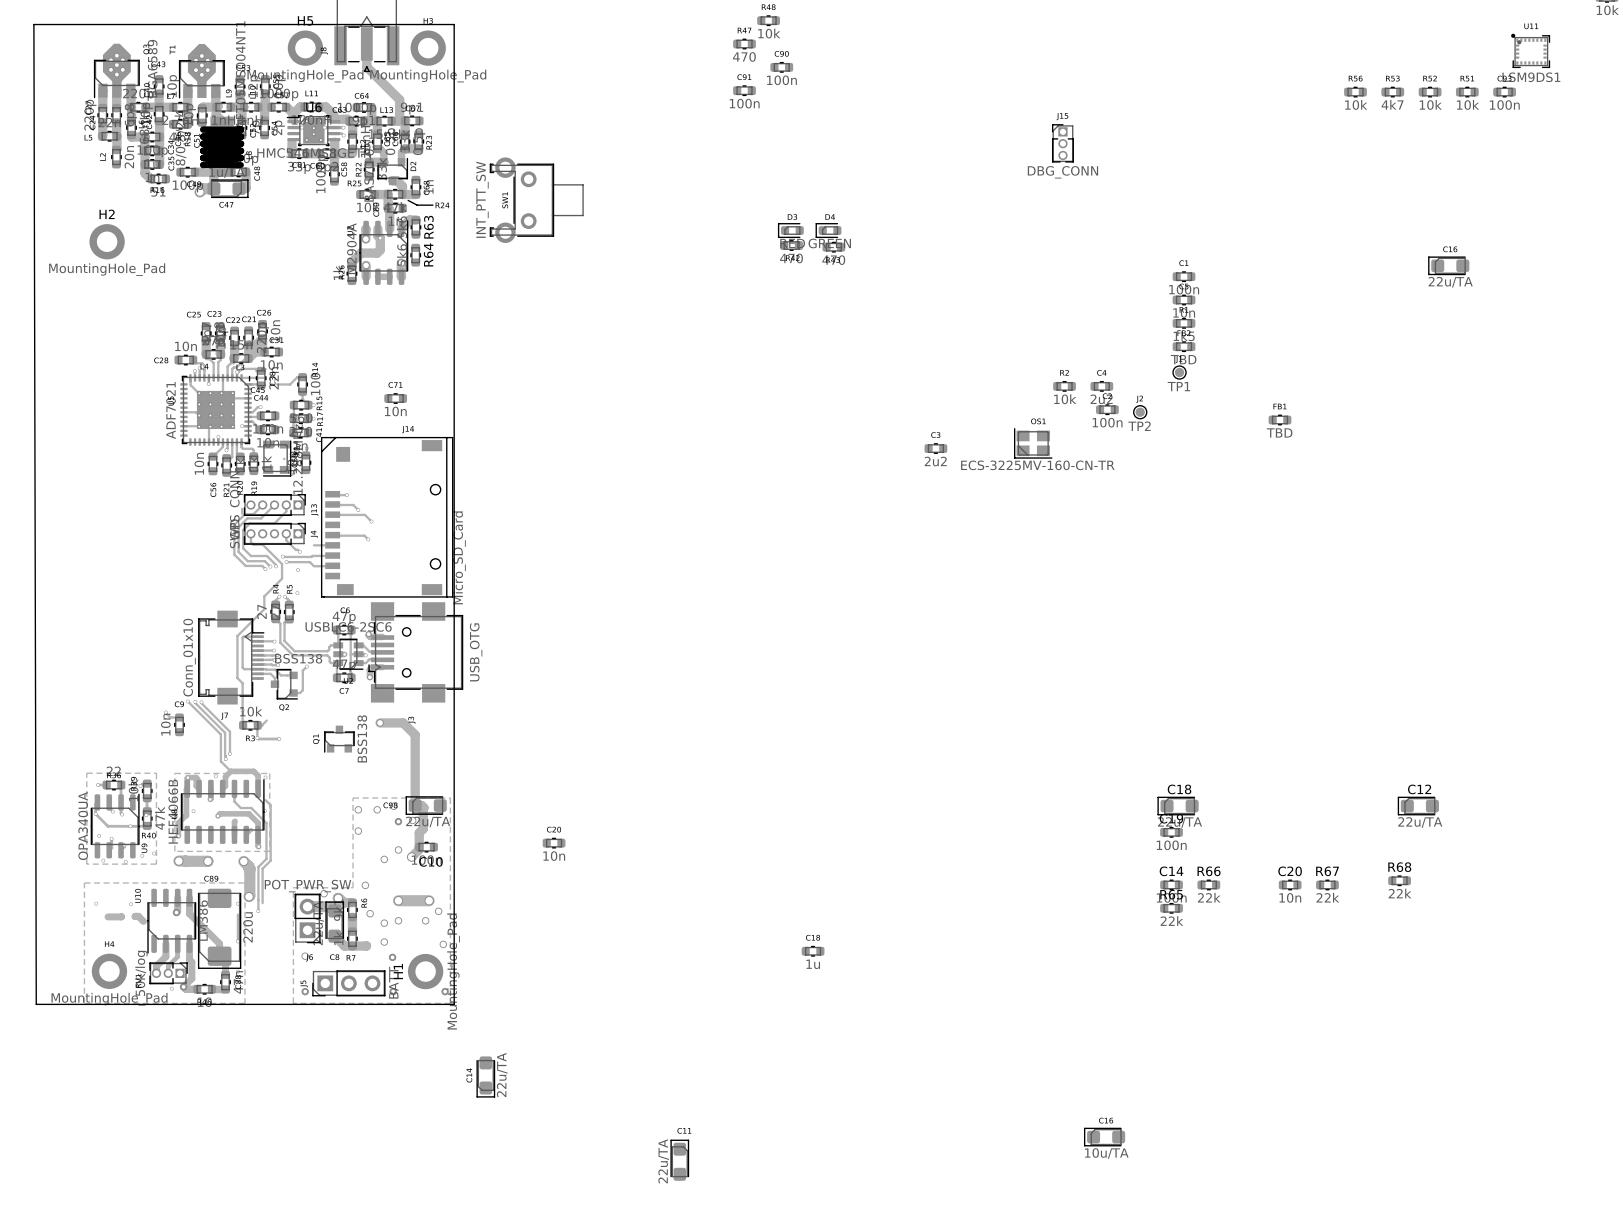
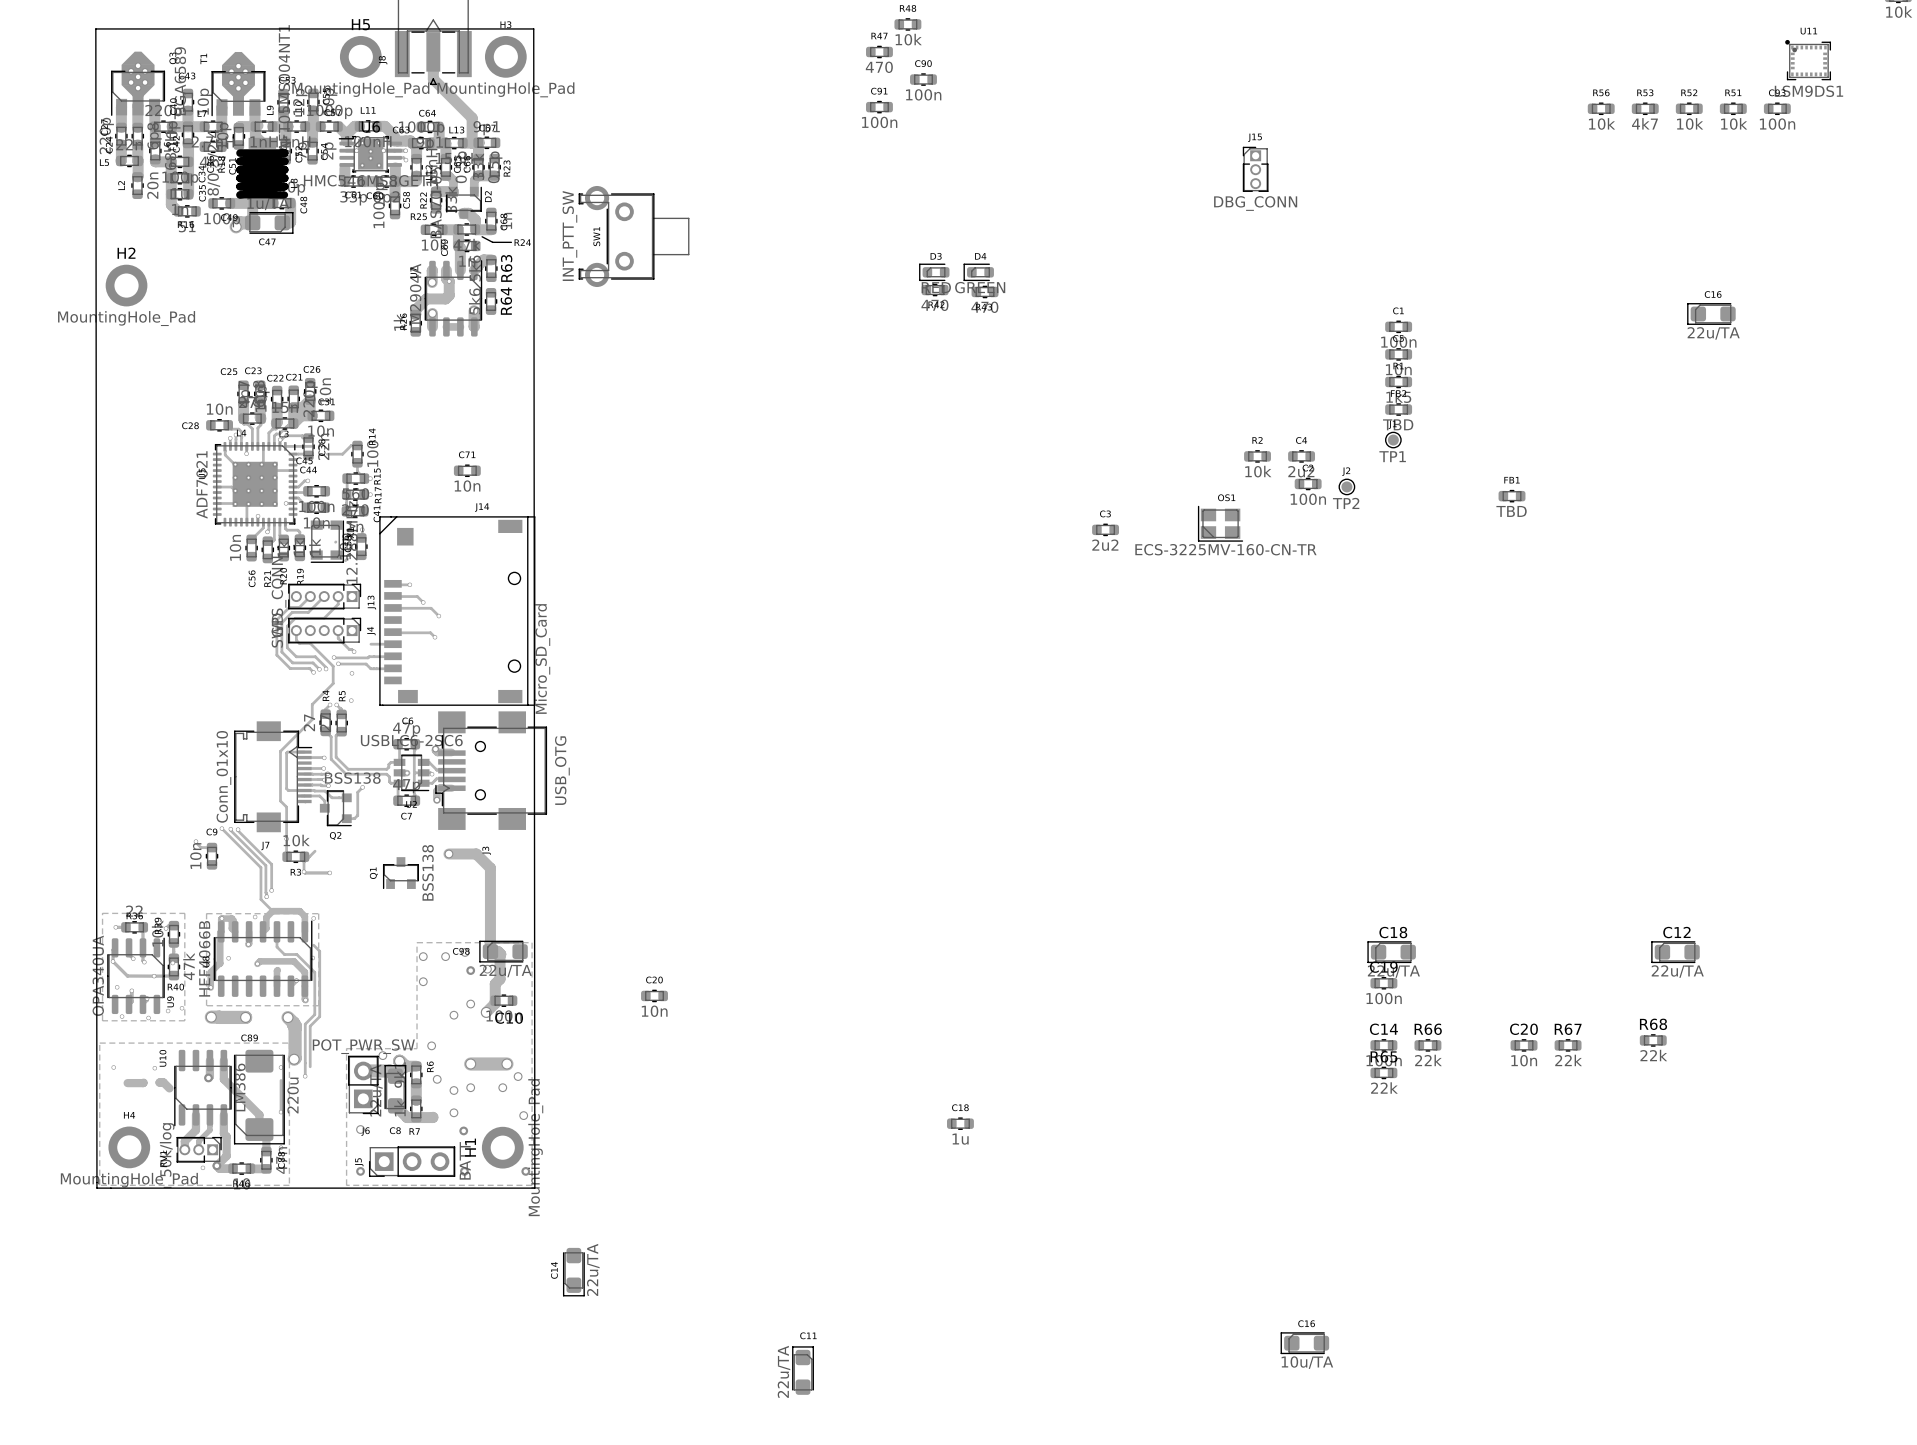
board edge: (81, 24) (33, 24) (36, 1004) (454, 1004) (454, 24) (451, 24) -> (95, 28) (96, 1188) (534, 1188) (533, 28)

